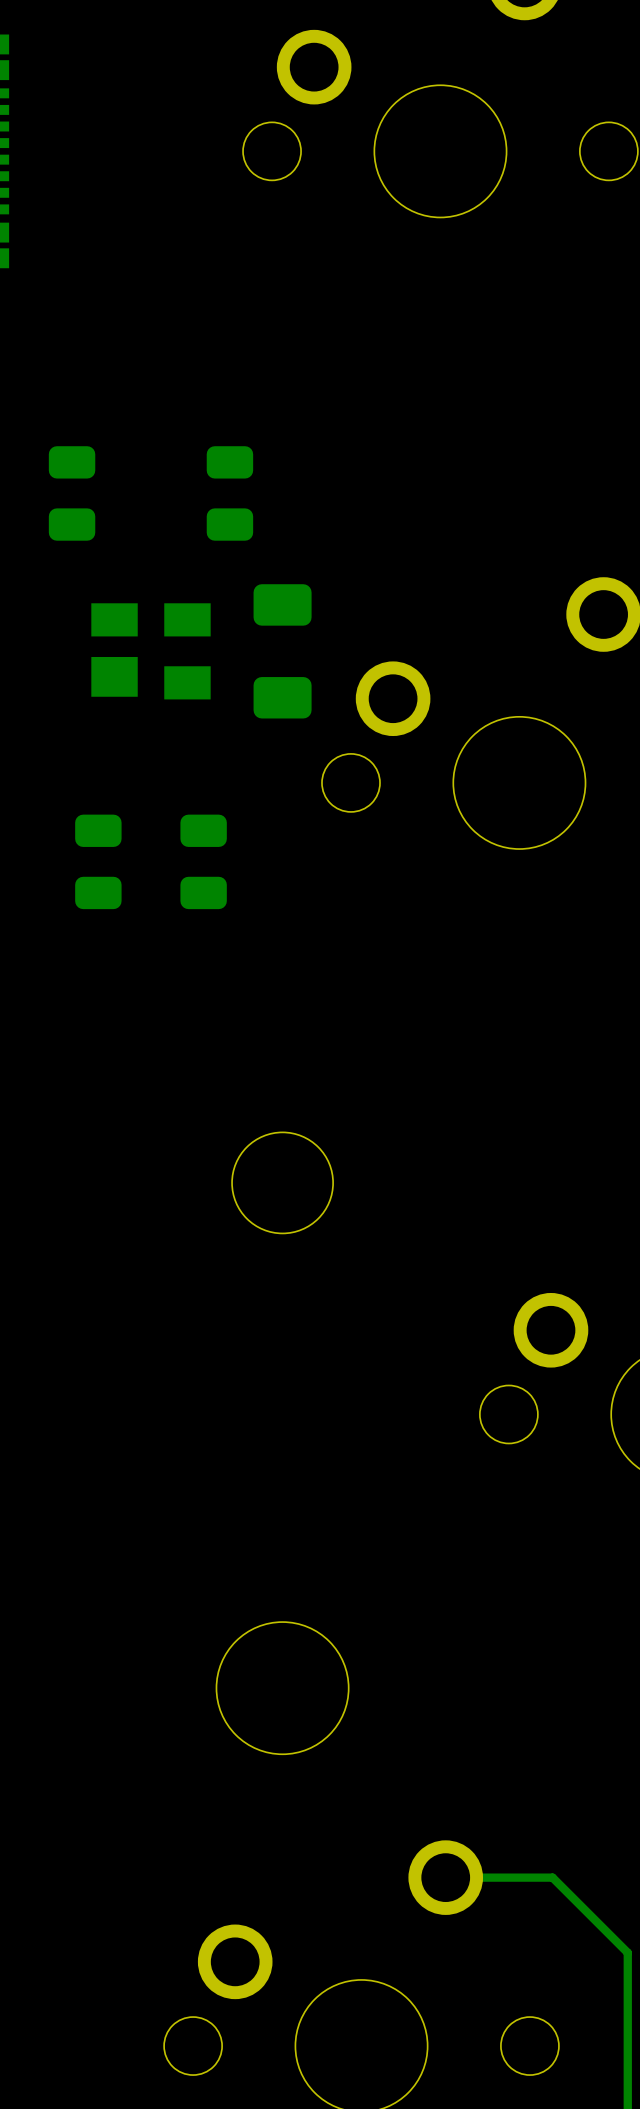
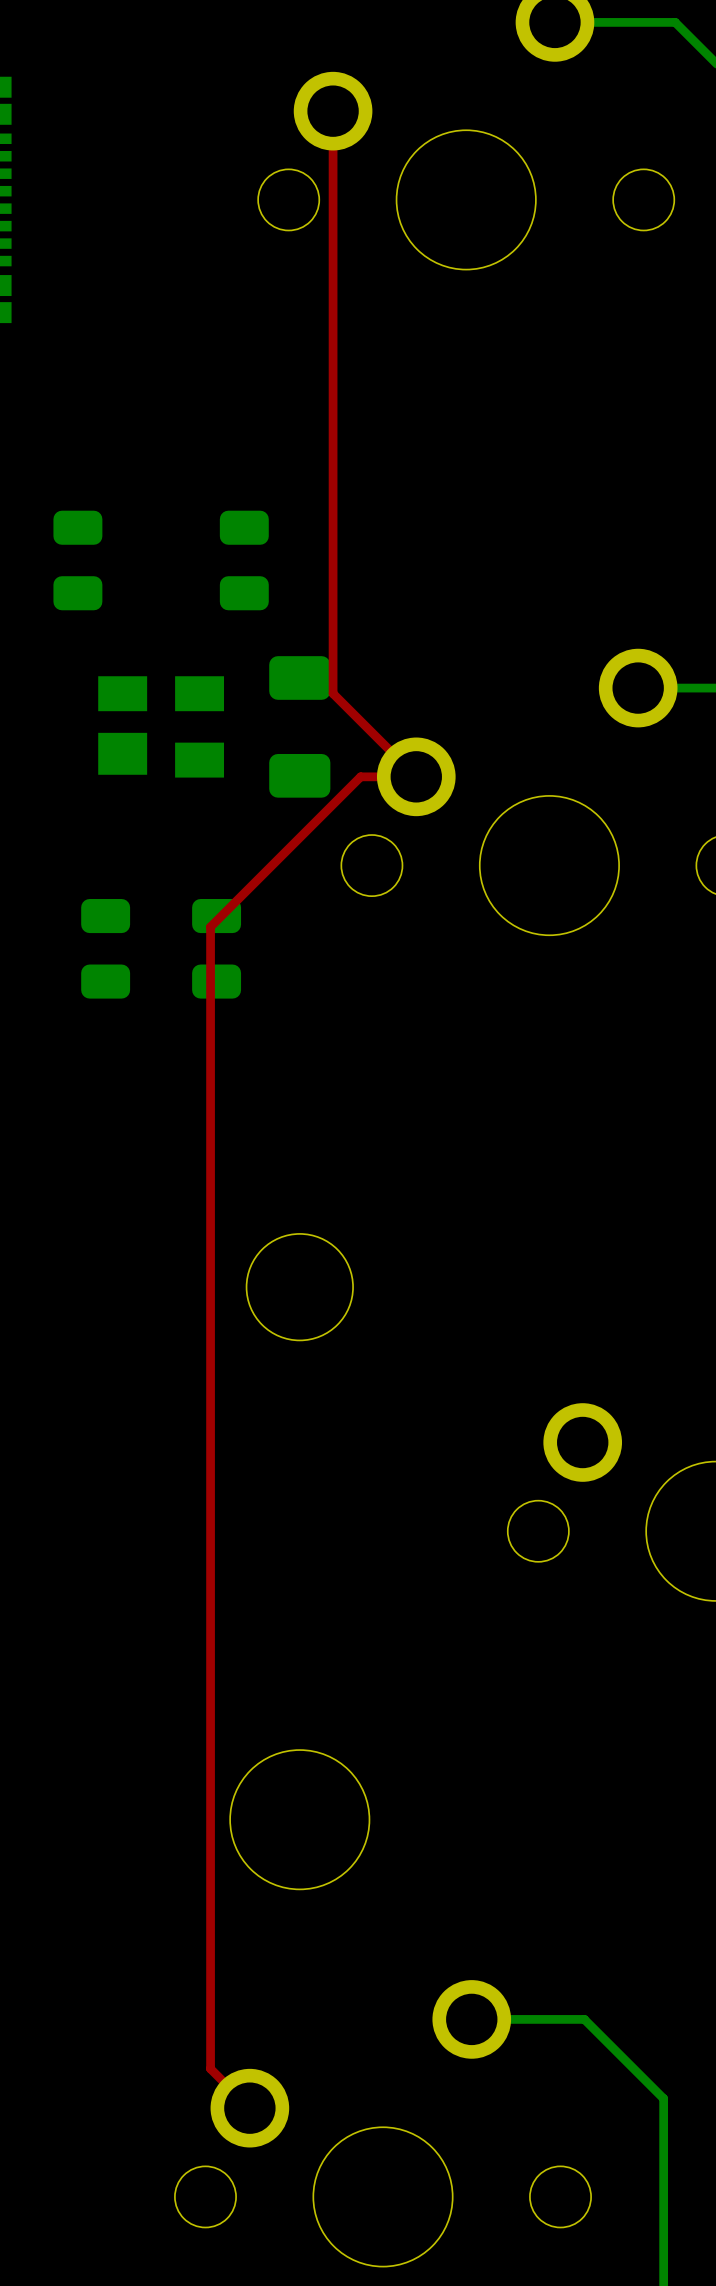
top track: none -> (333, 111) (333, 693) (416, 776) (360, 776) (210, 926) (210, 2068) (249, 2108)

